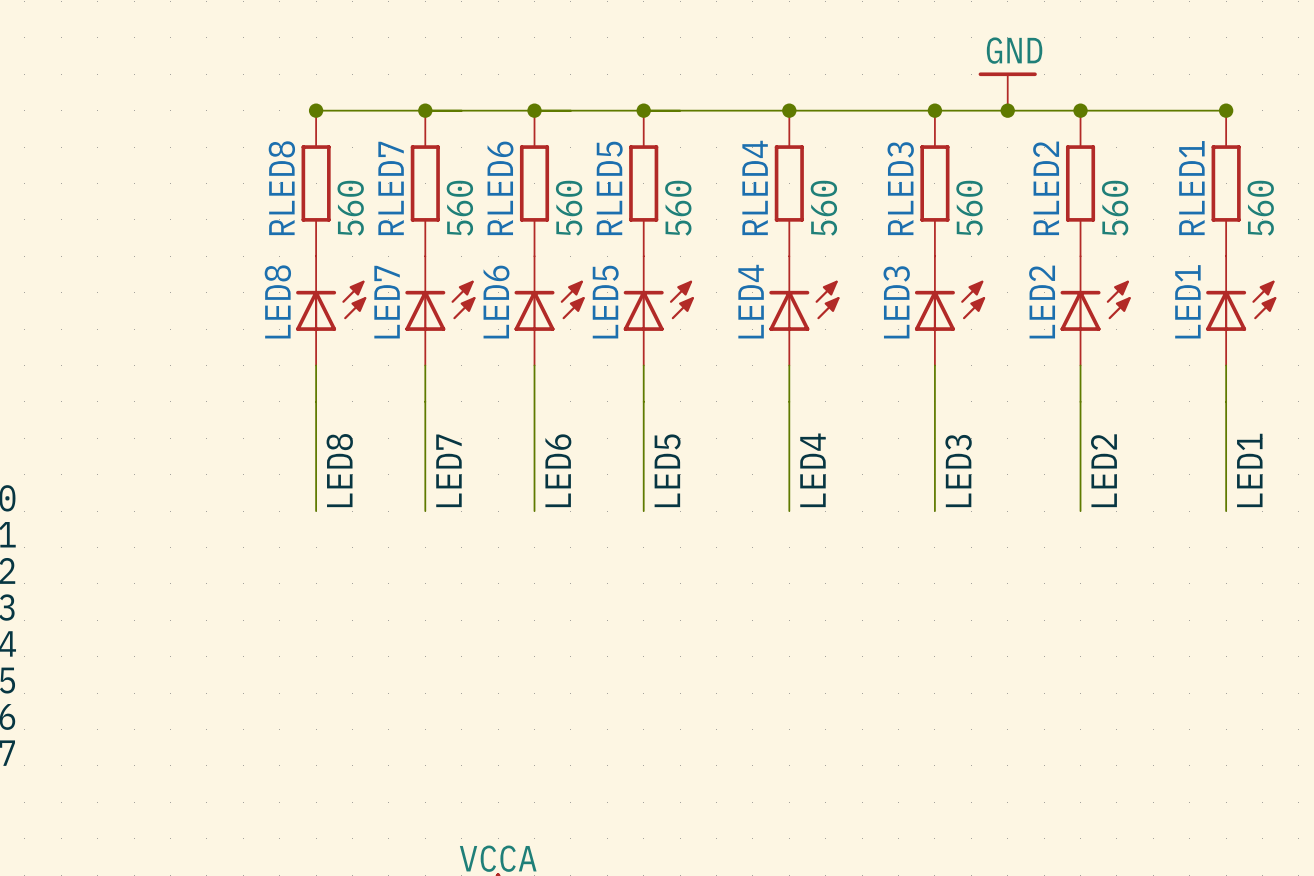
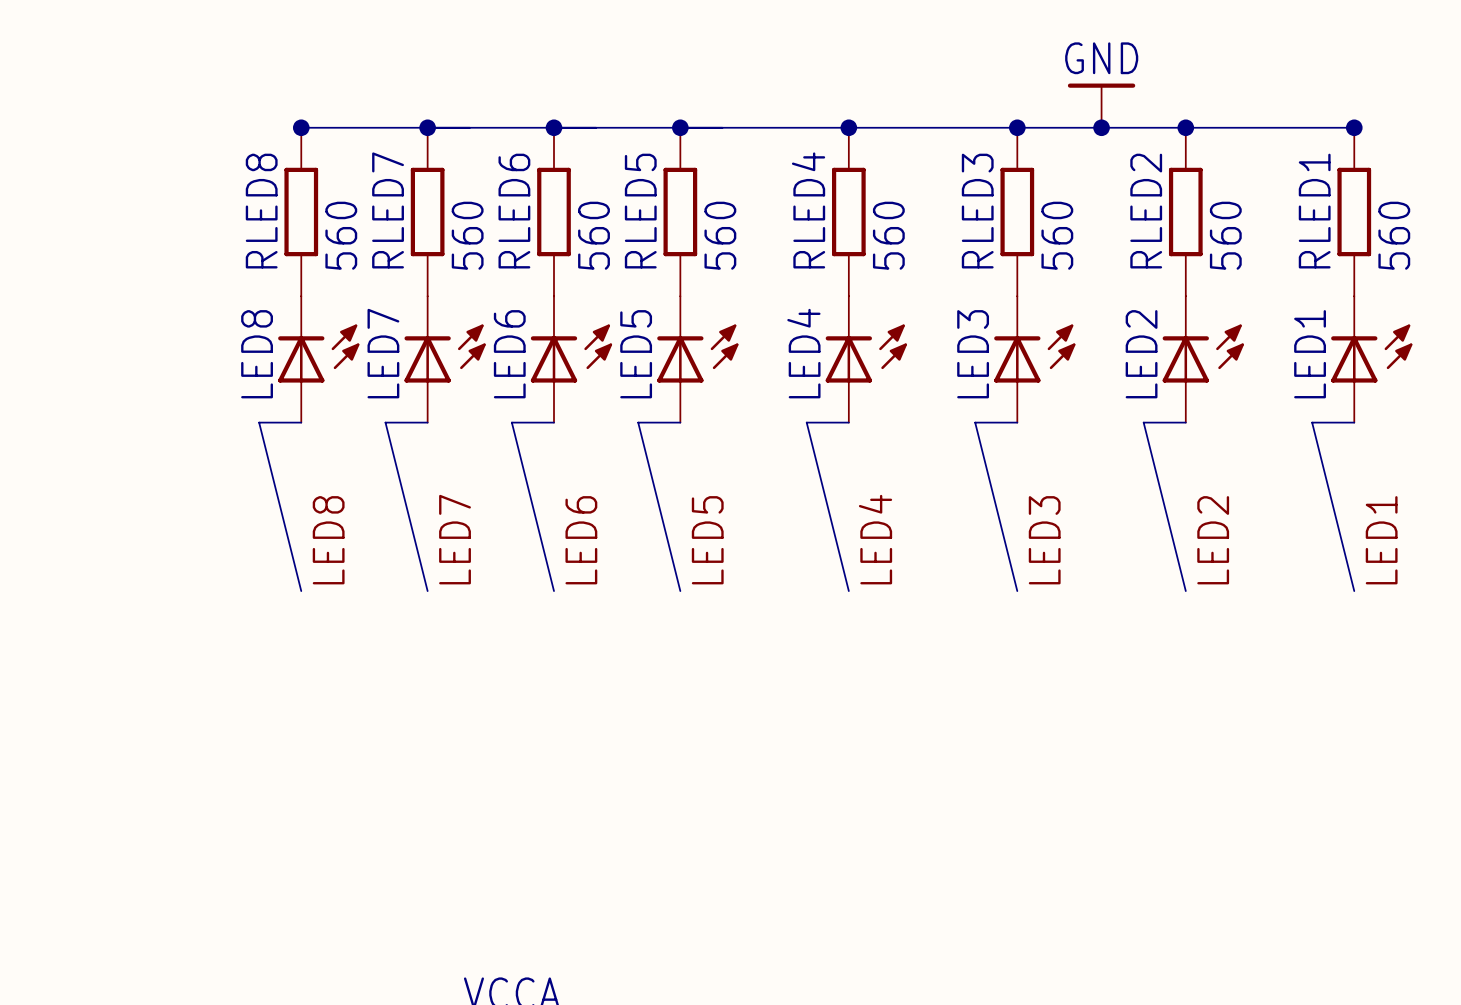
wire: (316, 365) (316, 511) -> (301, 422) (259, 422) (301, 591)
wire: (425, 365) (425, 511) -> (427, 422) (385, 422) (427, 591)
wire: (534, 365) (534, 511) -> (553, 422) (511, 422) (553, 591)
wire: (643, 365) (643, 511) -> (680, 422) (638, 422) (680, 591)
wire: (789, 365) (789, 511) -> (848, 422) (806, 422) (848, 591)
wire: (934, 365) (934, 511) -> (1017, 422) (975, 422) (1017, 591)
wire: (1080, 365) (1080, 511) -> (1185, 422) (1143, 422) (1185, 591)
wire: (1226, 365) (1226, 511) -> (1354, 422) (1312, 422) (1354, 591)

